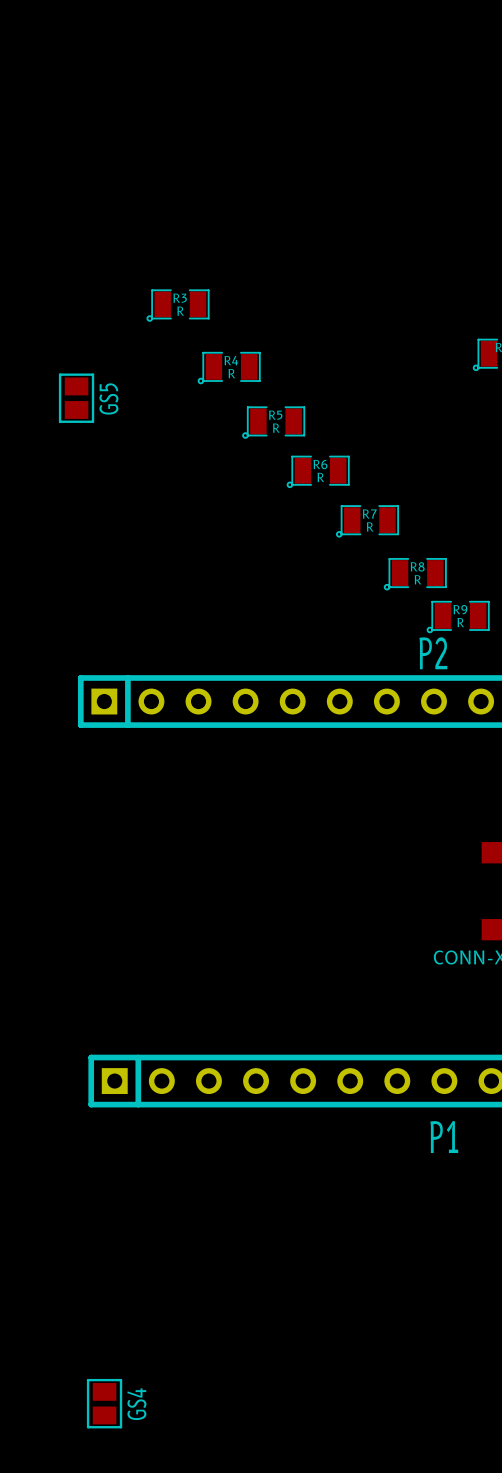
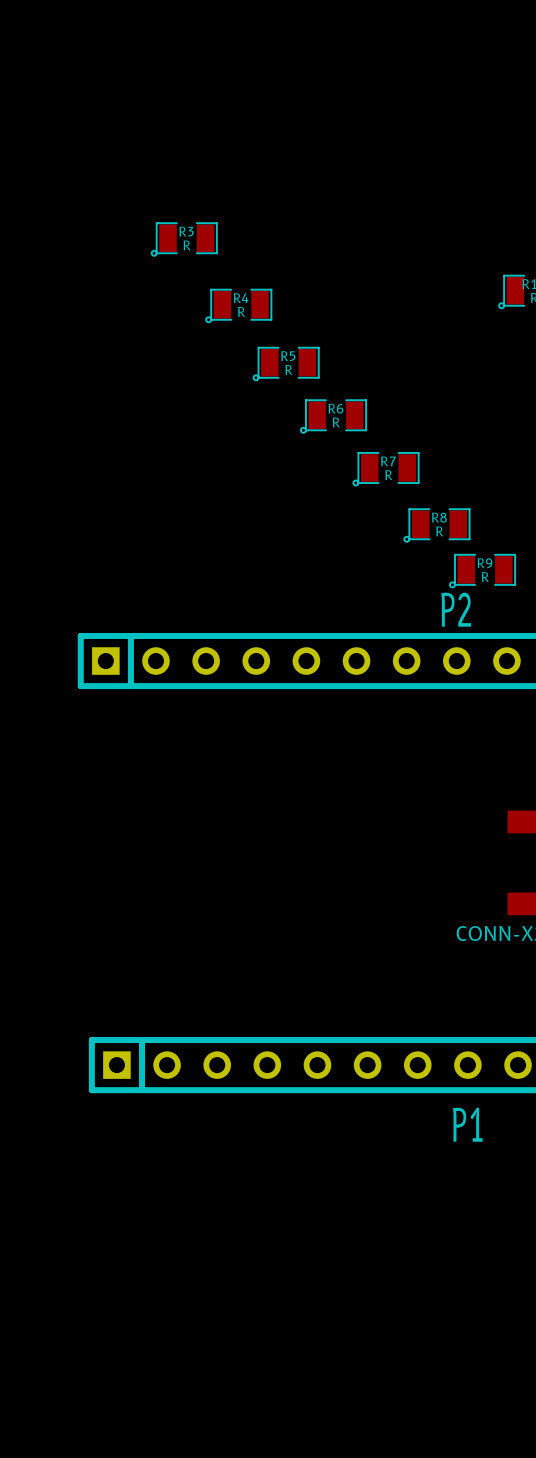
GS5: (76, 398) -> none
GS4: (104, 1403) -> none

